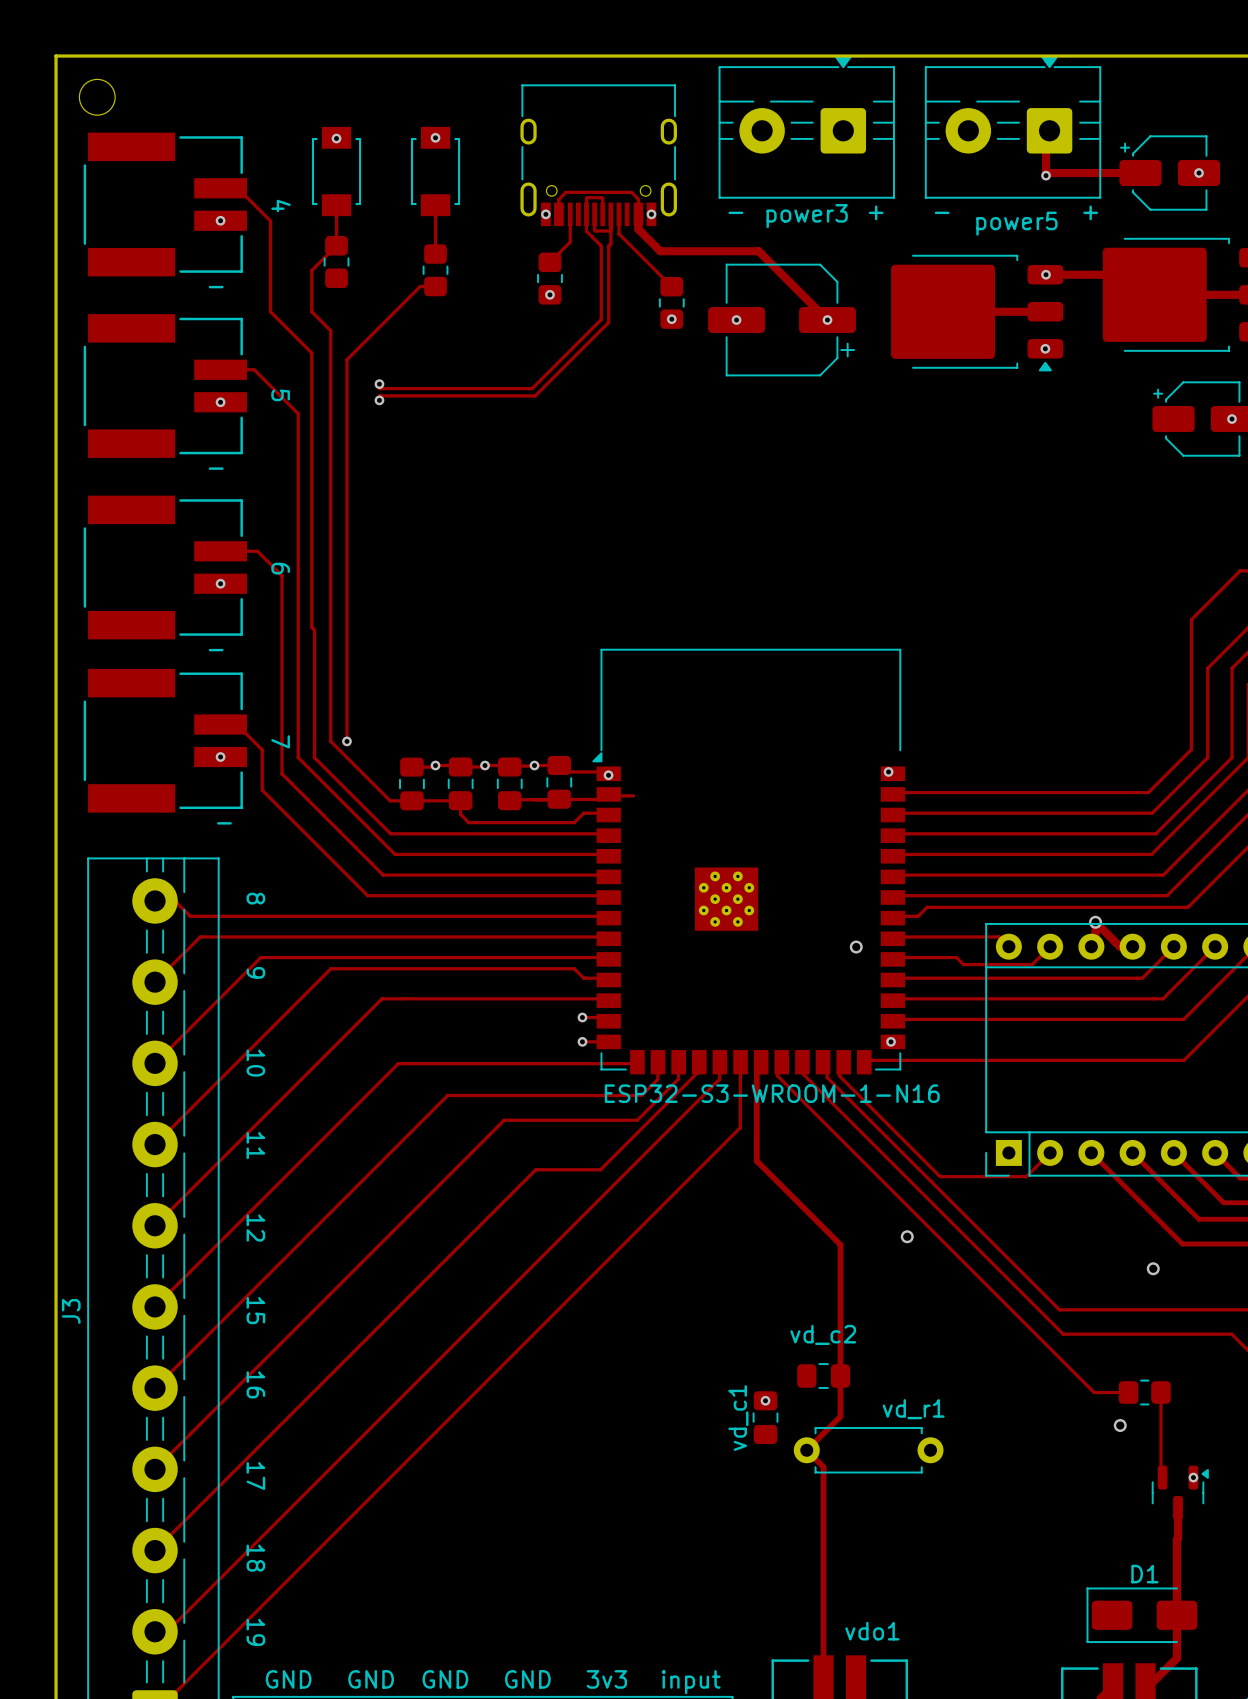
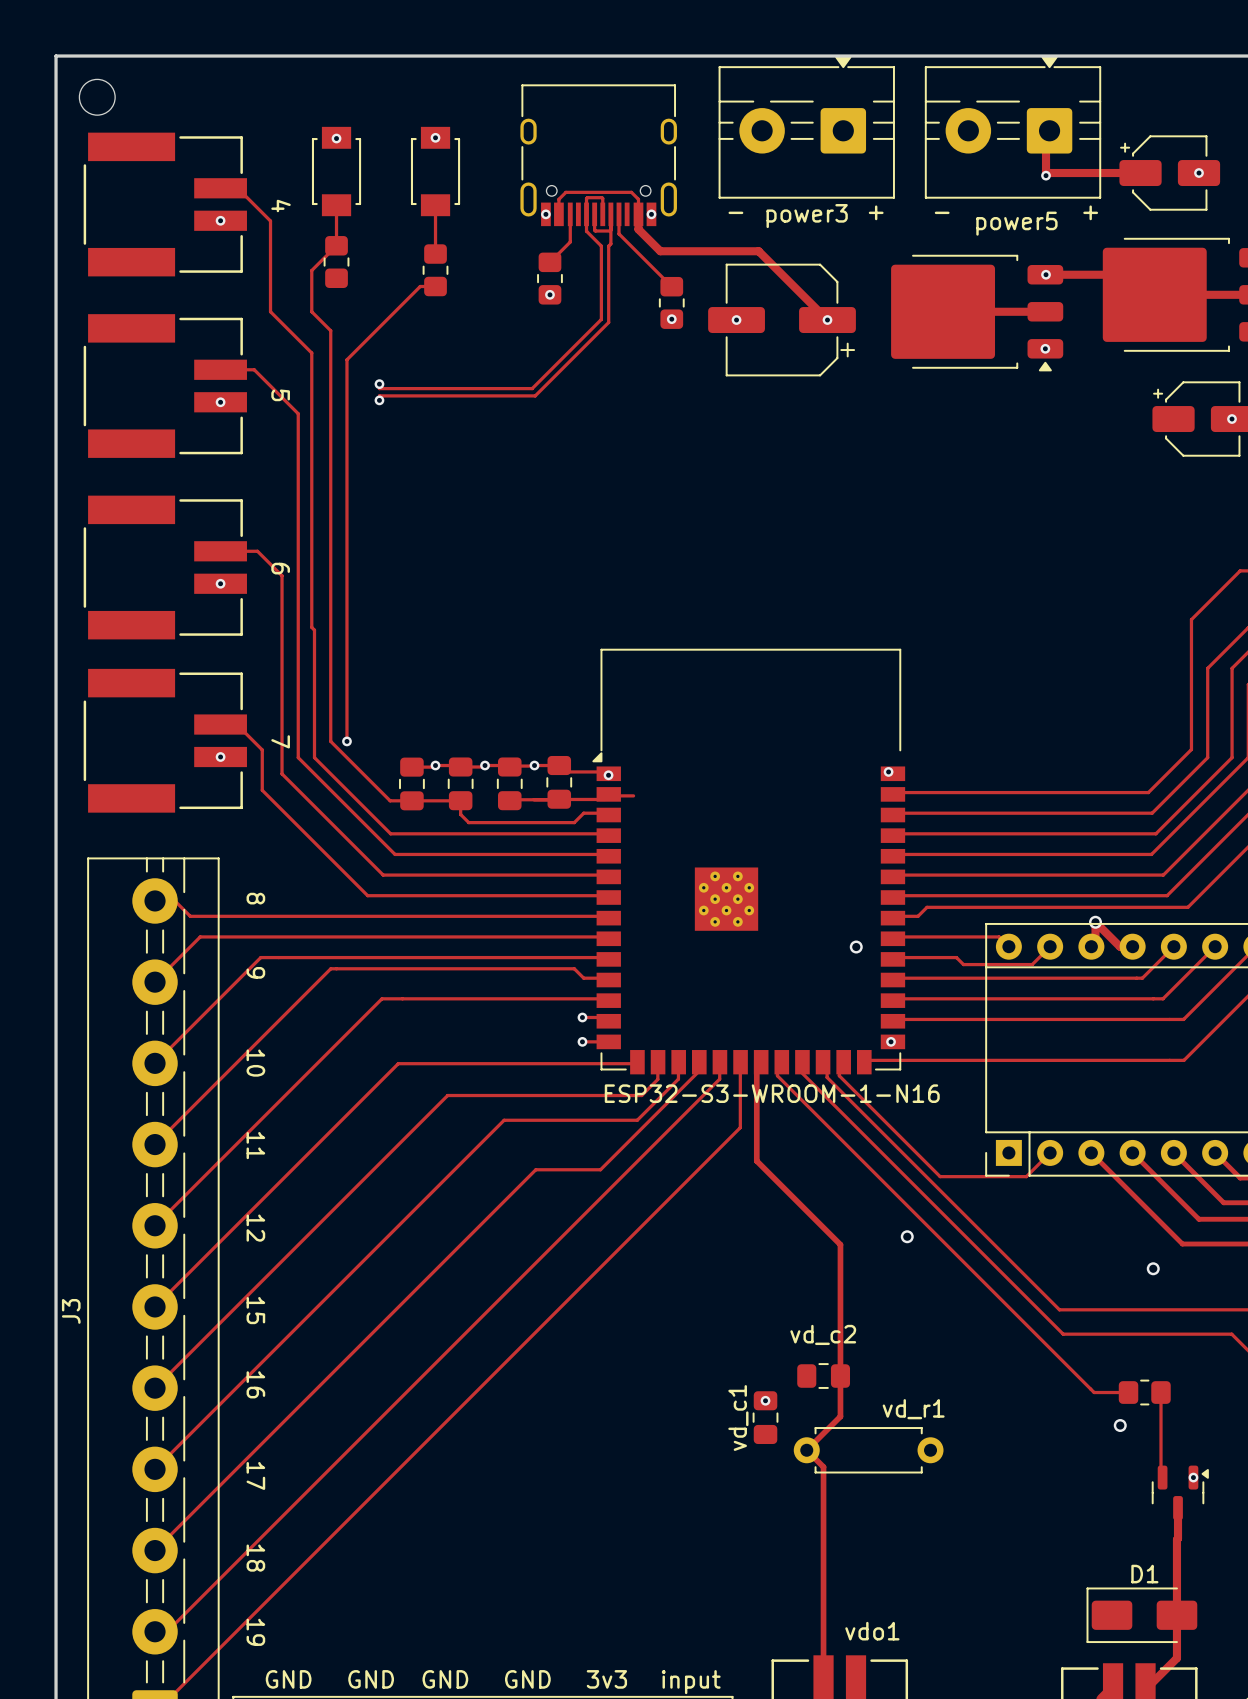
text: - (216, 287) -> none
text: - (216, 468) -> none
text: - (216, 650) -> none
text: - (224, 823) -> none

